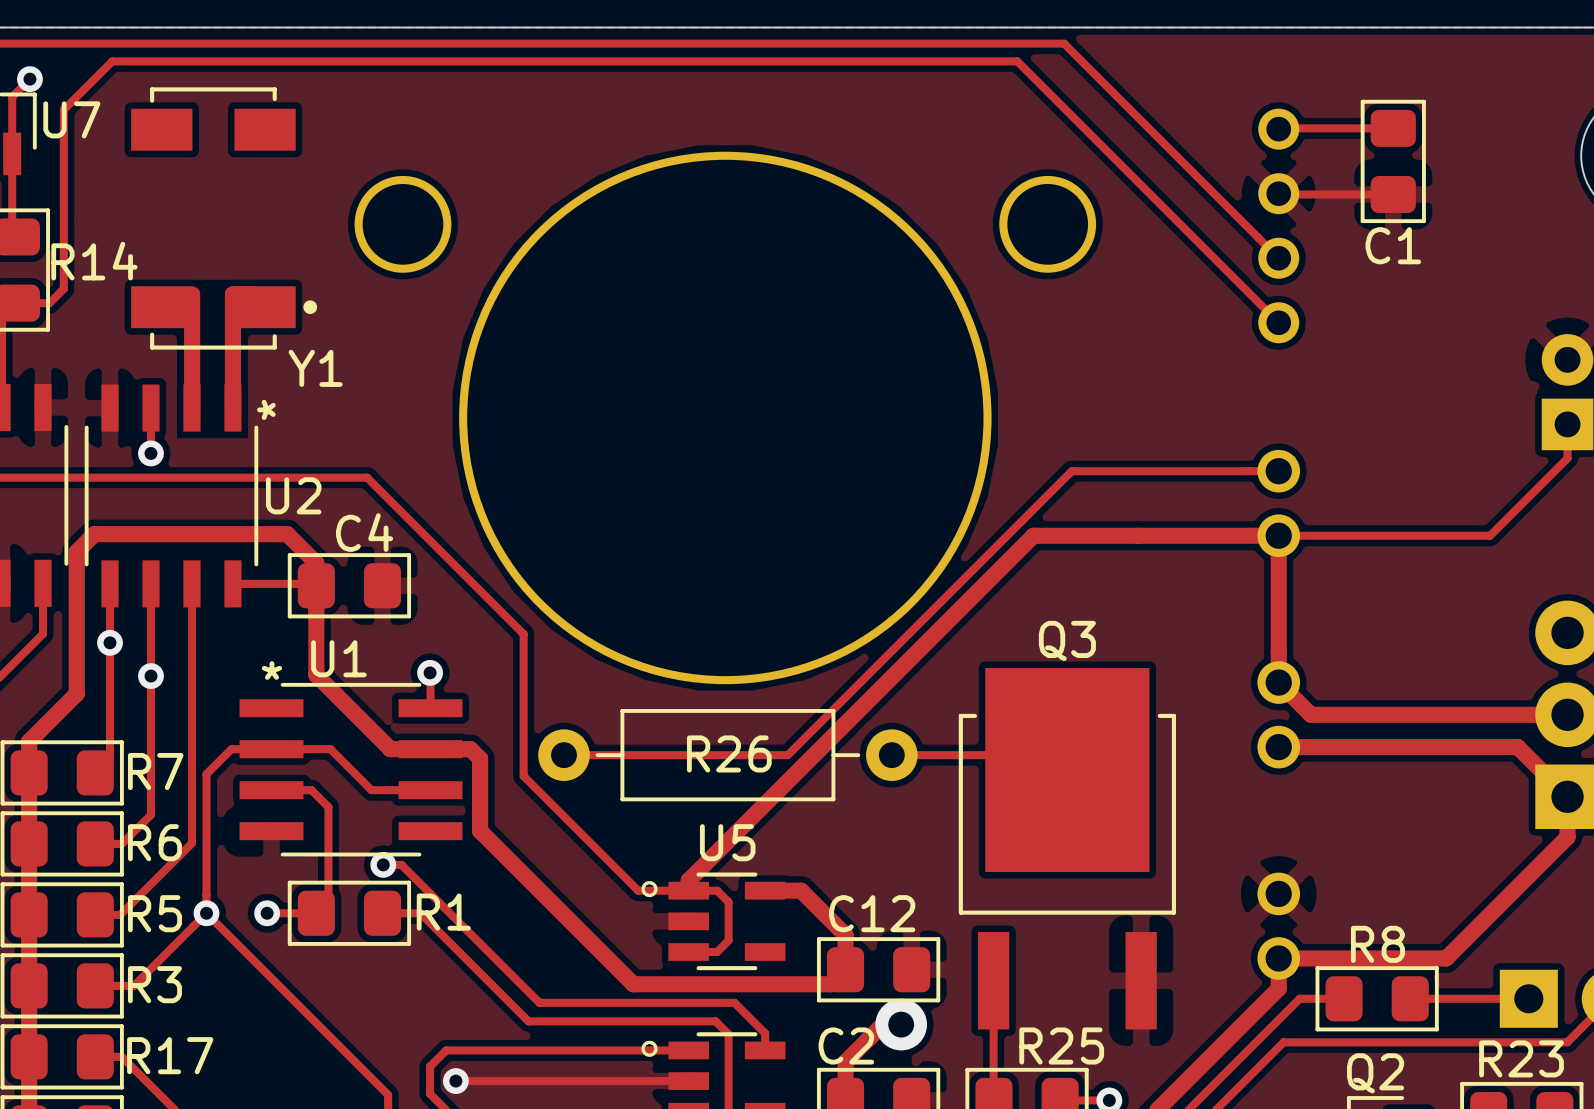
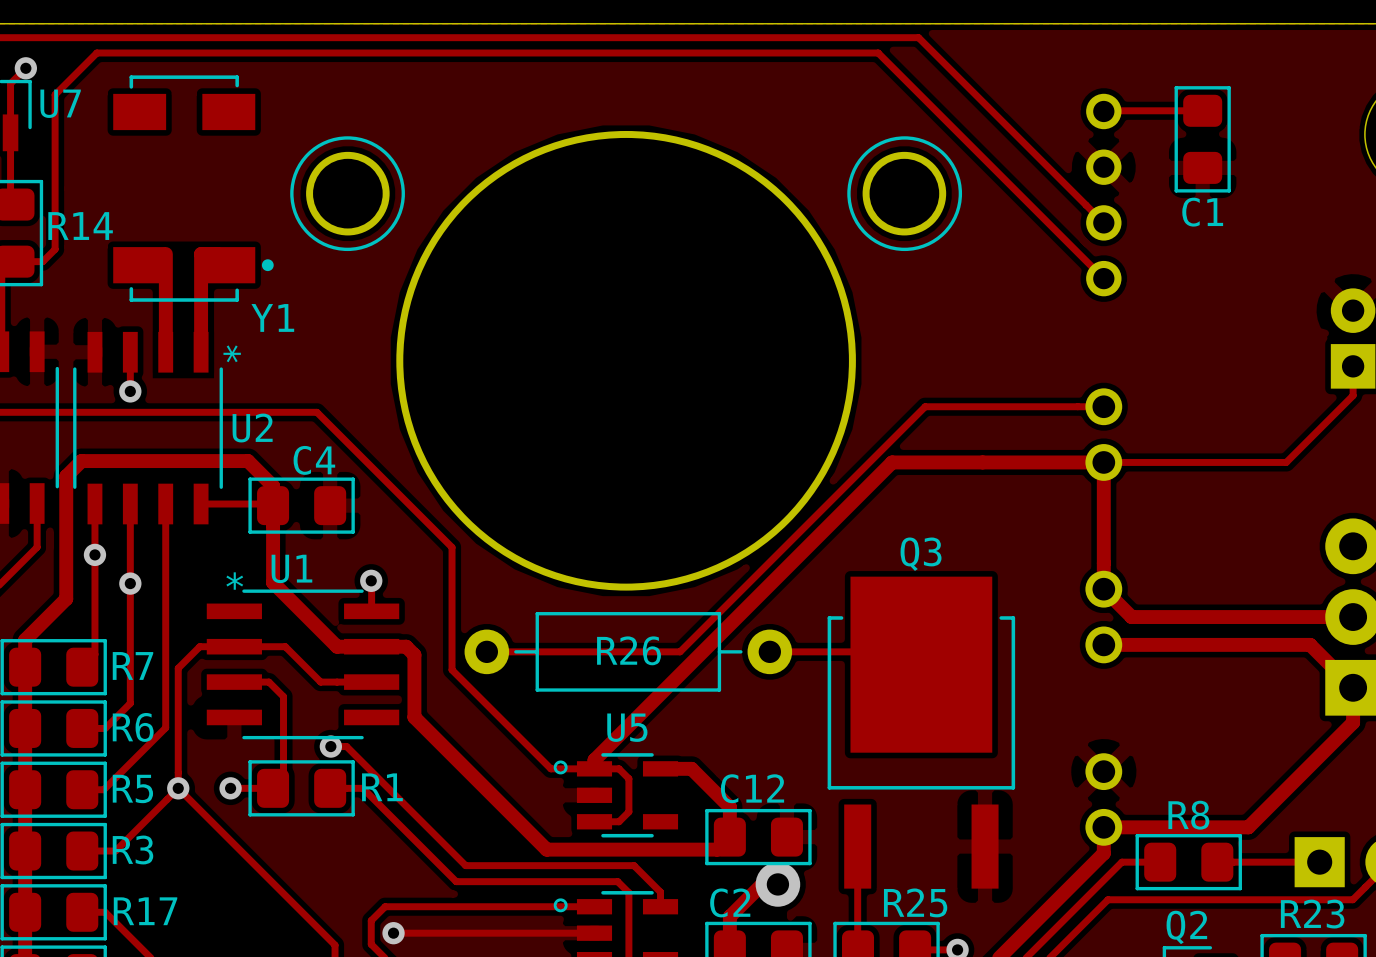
drawing: none -> [290, 136, 405, 252]
drawing: none -> [847, 136, 963, 252]
track: (1278, 193) (1393, 194) -> none

